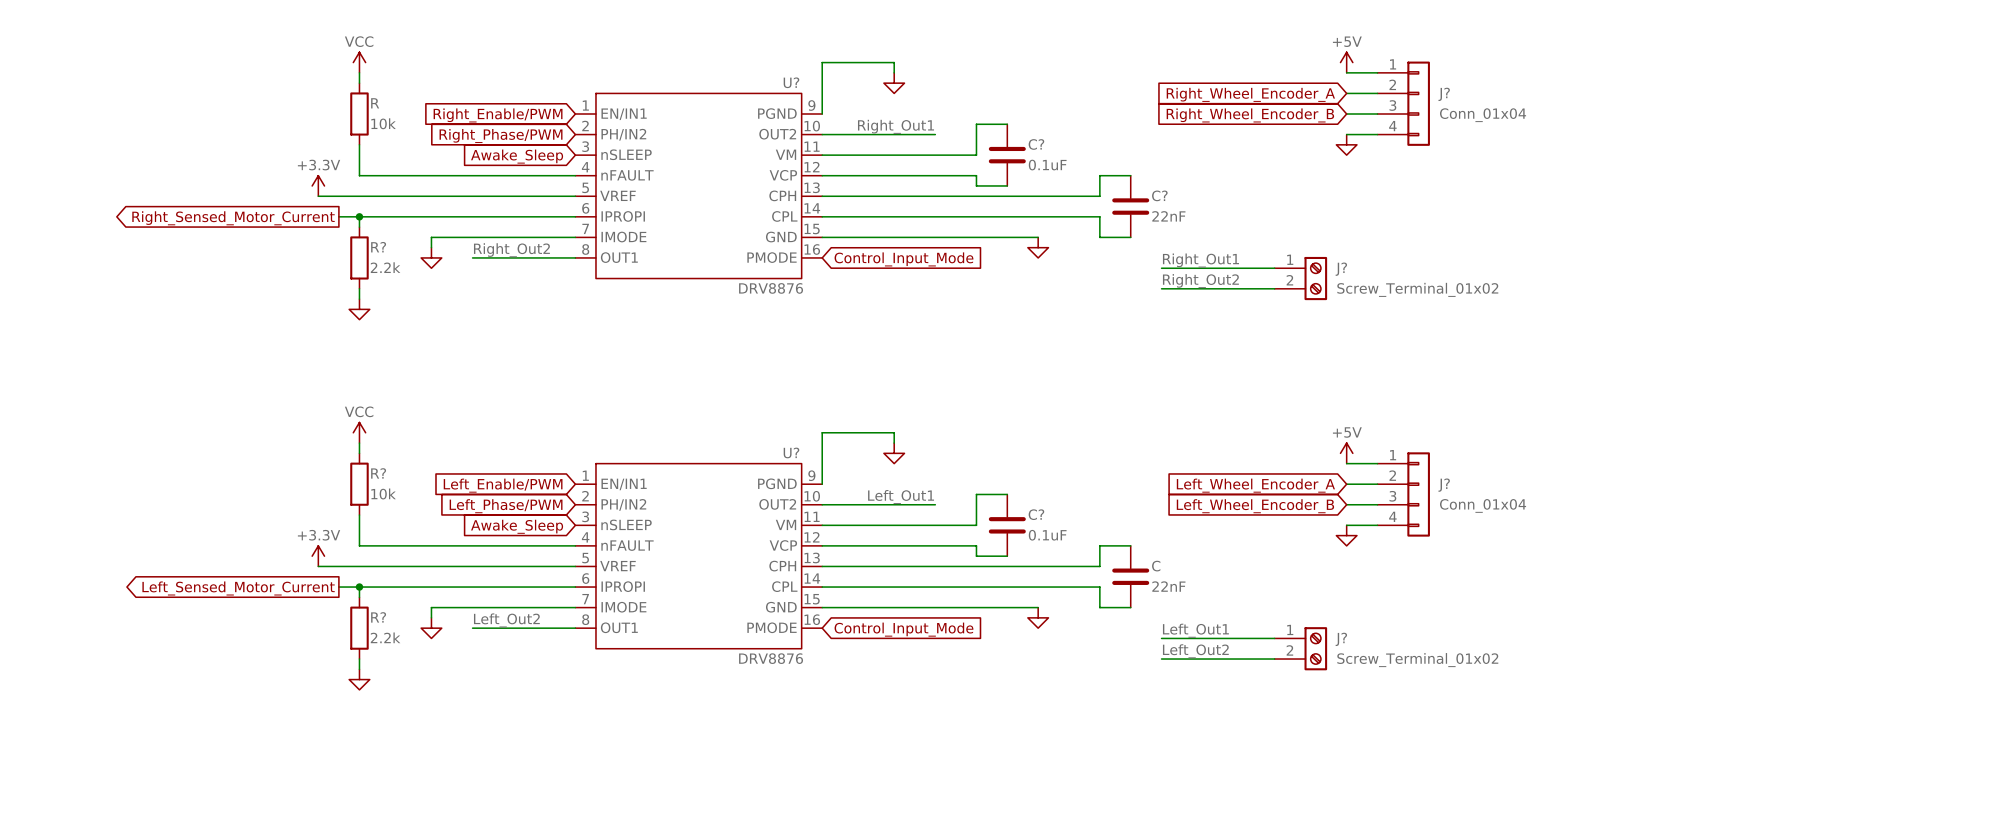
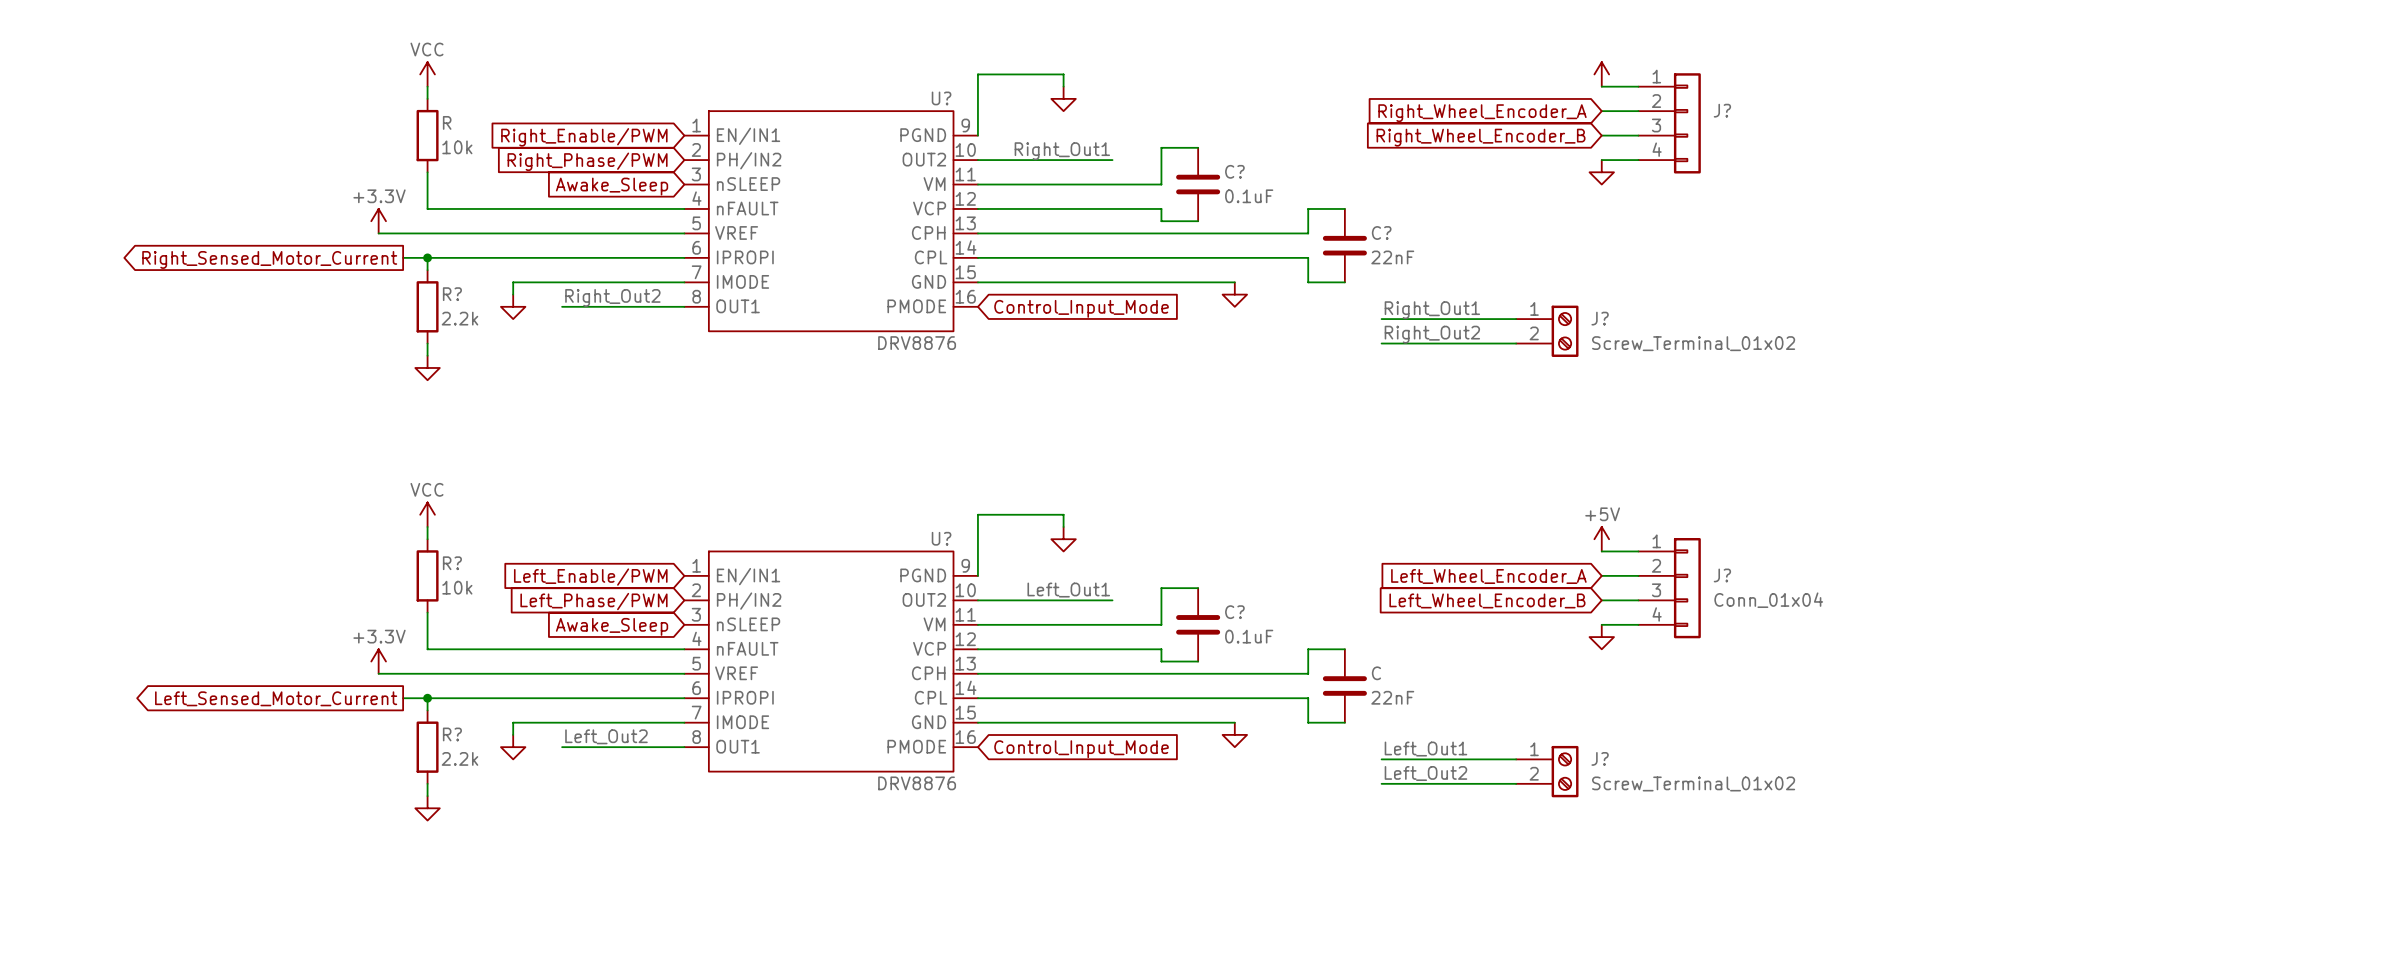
power symbol text: +5V (1347, 41) -> none
J? value: Conn_01x04 (1483, 115) -> none

